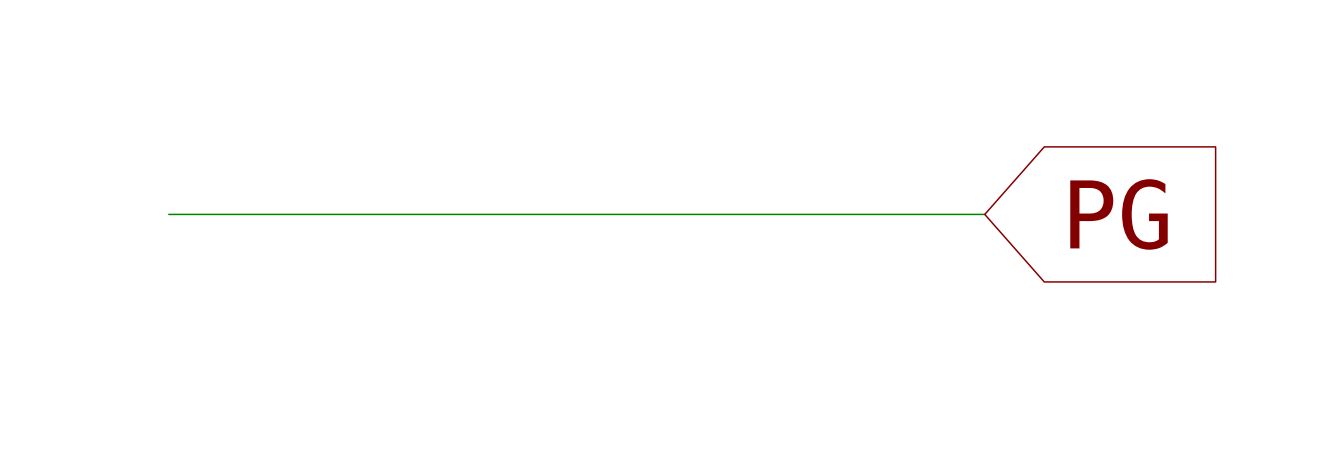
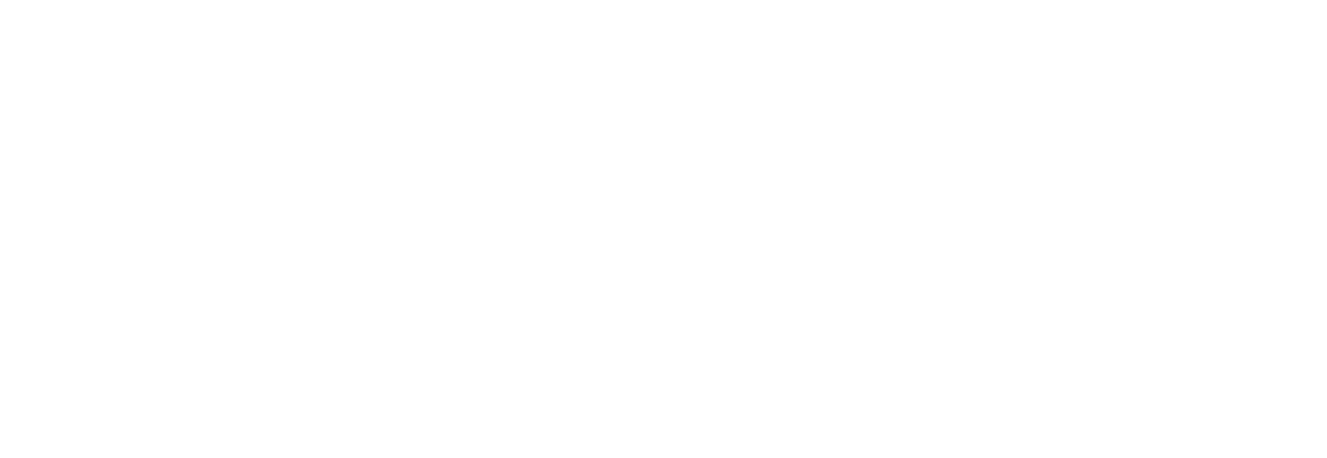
wire: (168, 214) (984, 214) -> none
global label: PG (1118, 214) -> none

